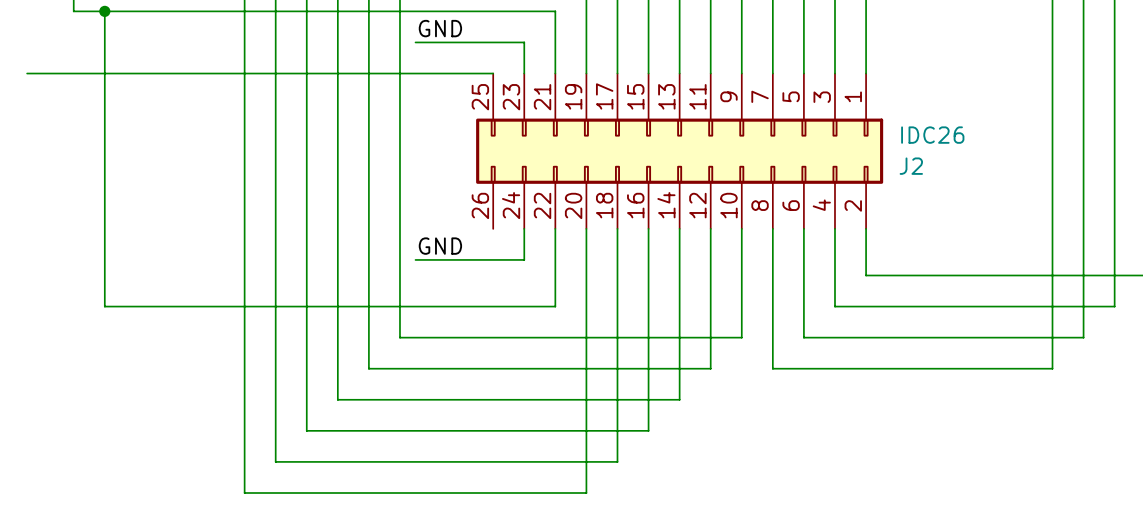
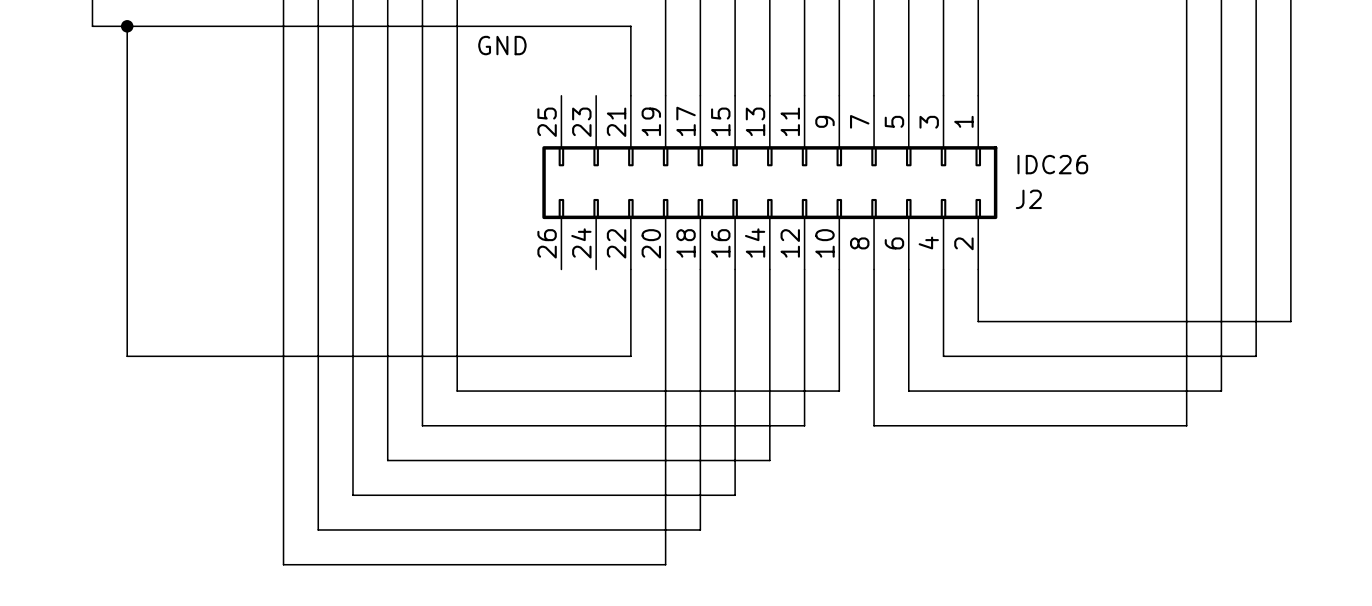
wire: (415, 42) (524, 42) (524, 73) -> none
wire: (27, 73) (493, 73) -> none
wire: (524, 228) (524, 259) (415, 259) -> none
label: GND (440, 246) -> none

